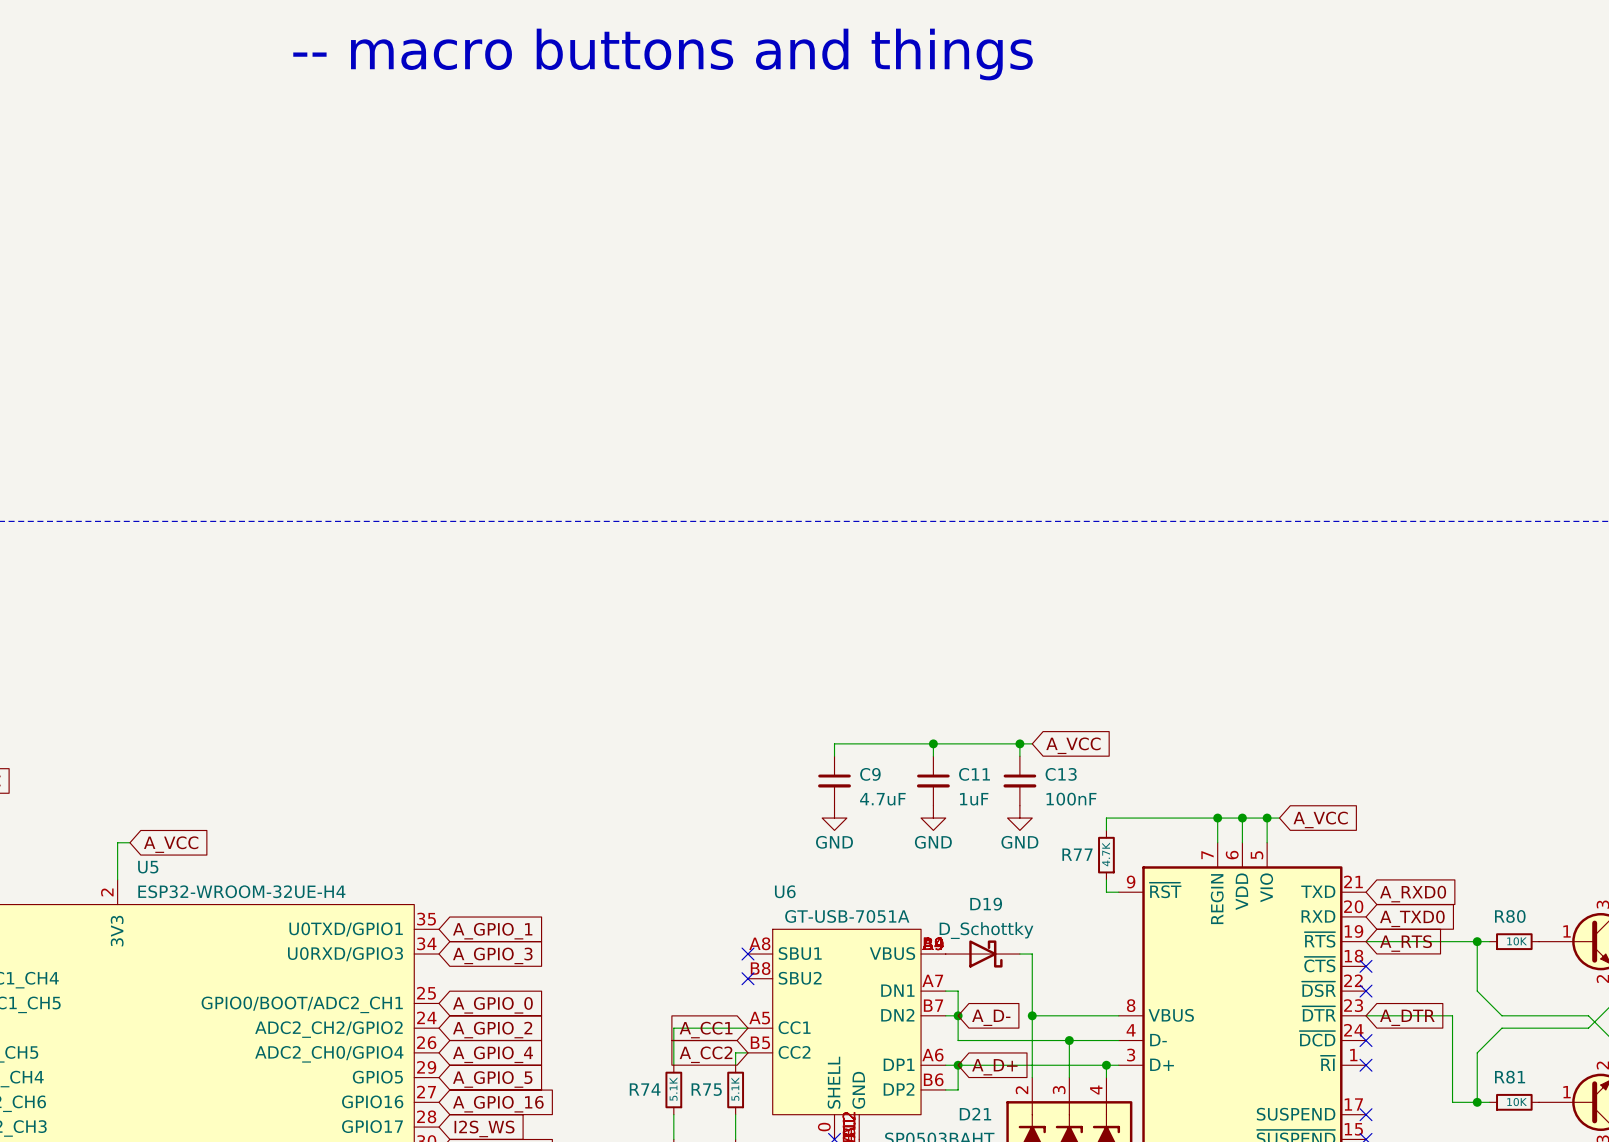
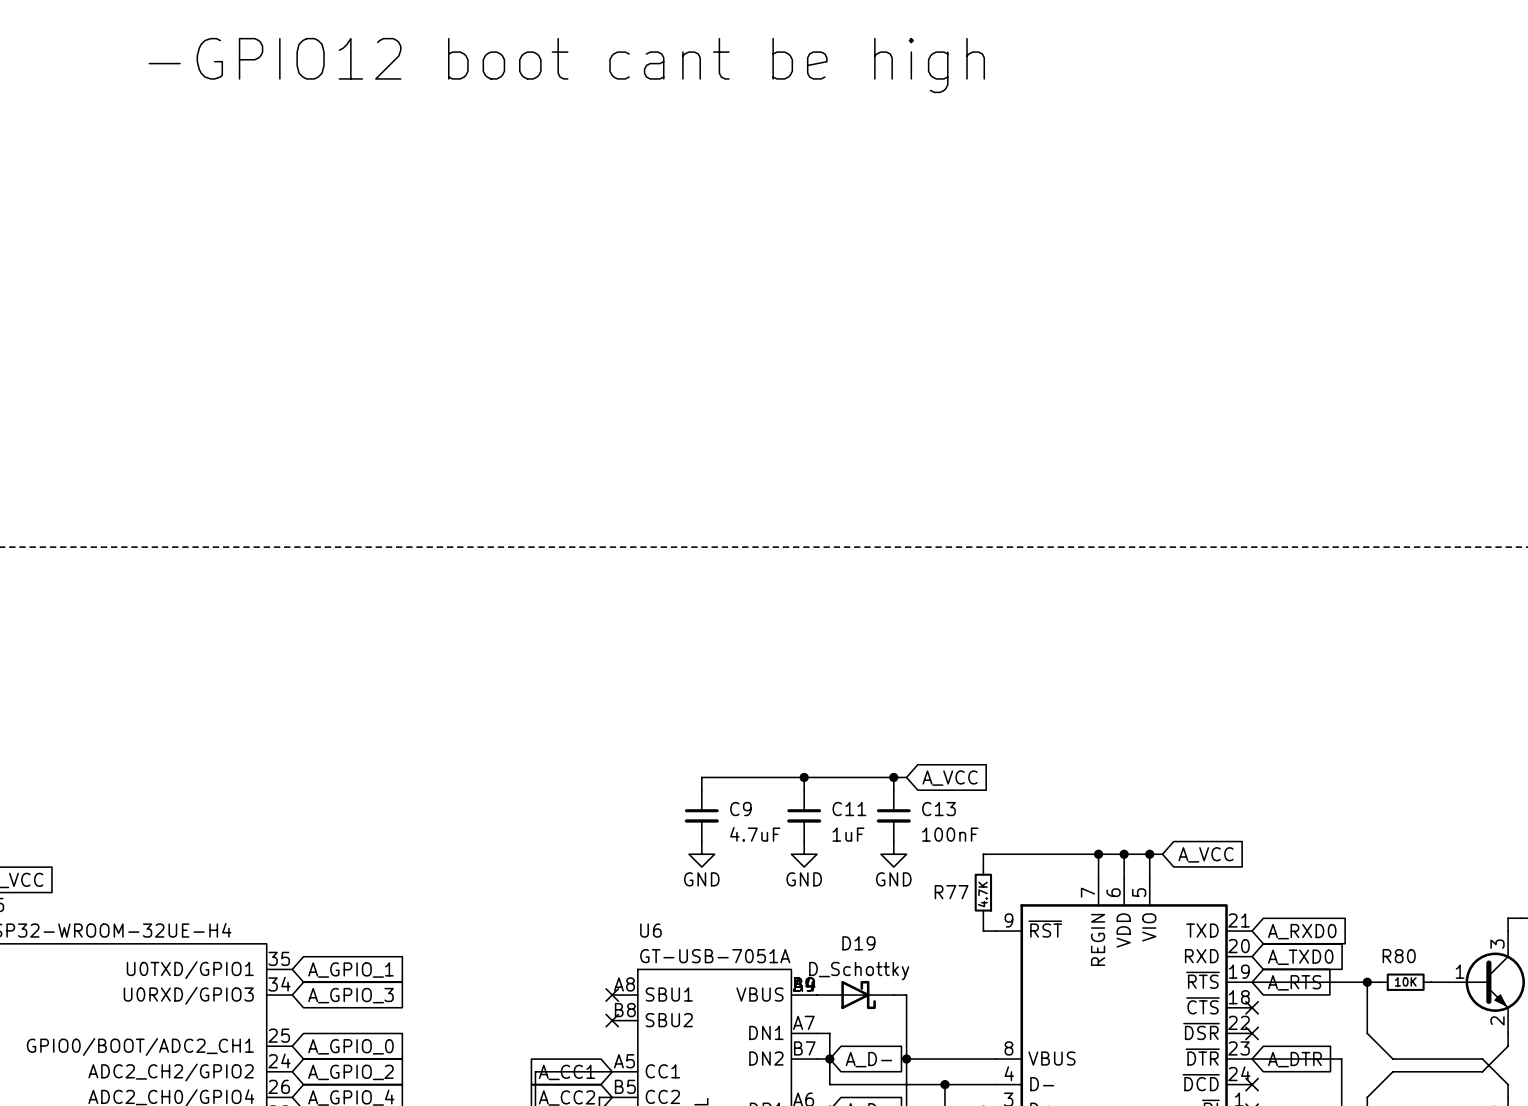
text: -- macro buttons and things (663, 54) -> -GPIO12 boot cant be high (566, 65)

